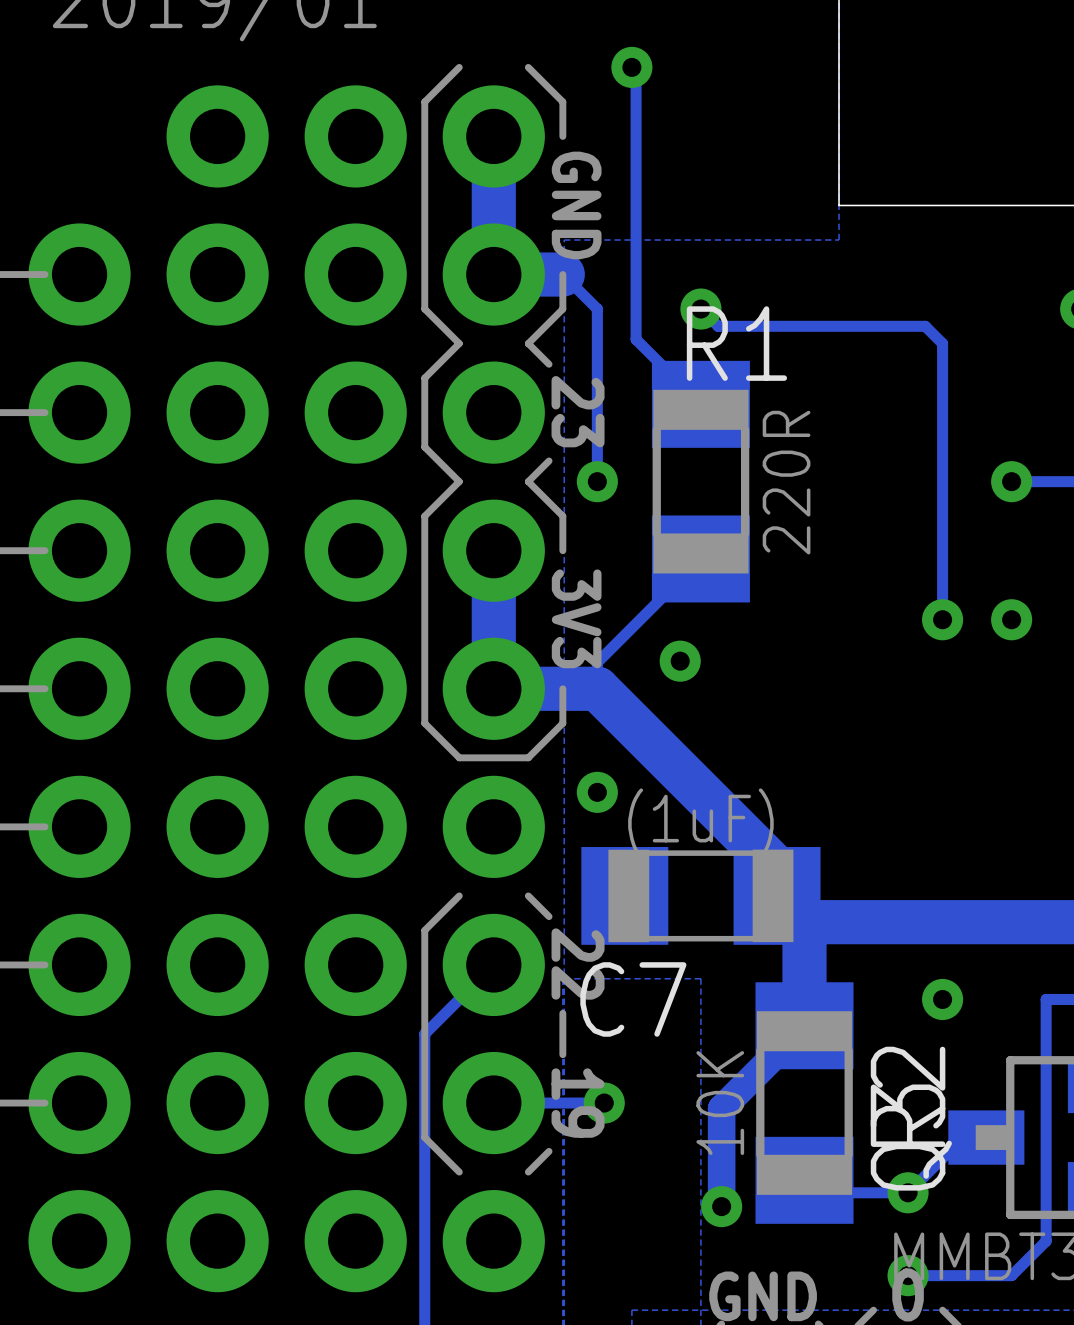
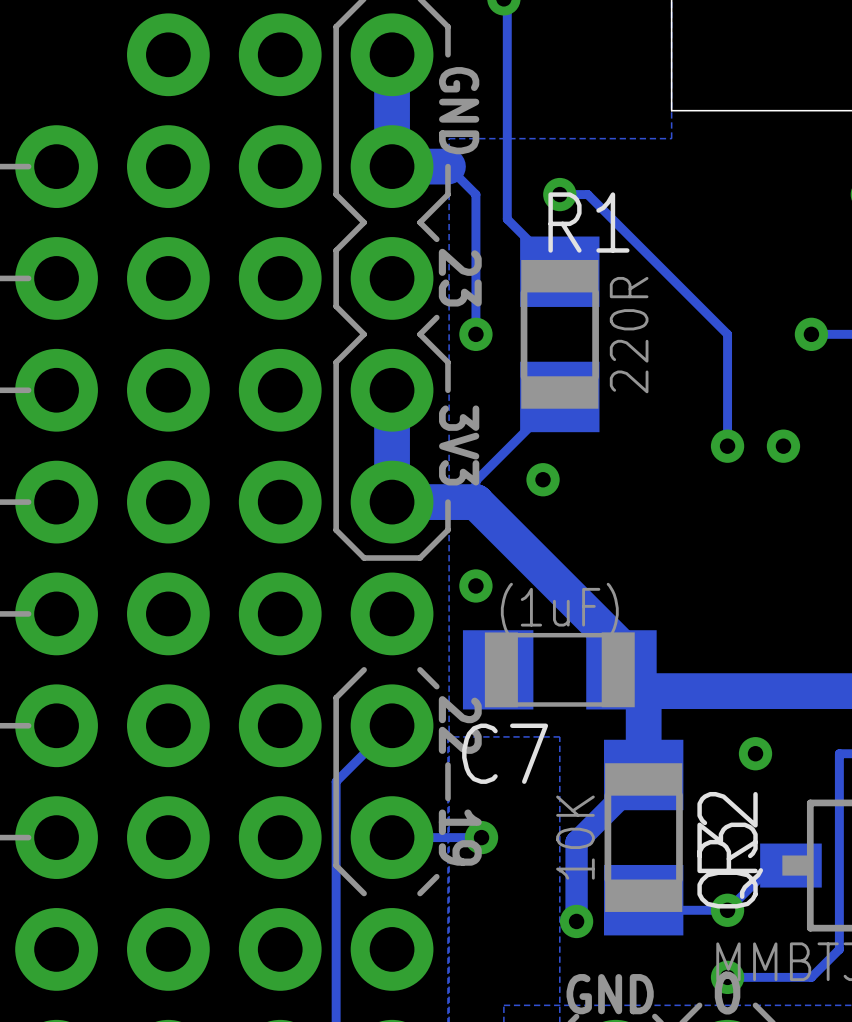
track: (700, 309) (718, 326) (925, 326) (942, 343) (942, 619) -> (559, 194) (587, 194) (727, 334) (727, 446)
via: none -> (727, 446)
via: (942, 619) -> none
via: none -> (783, 446)
via: (1011, 619) -> none

